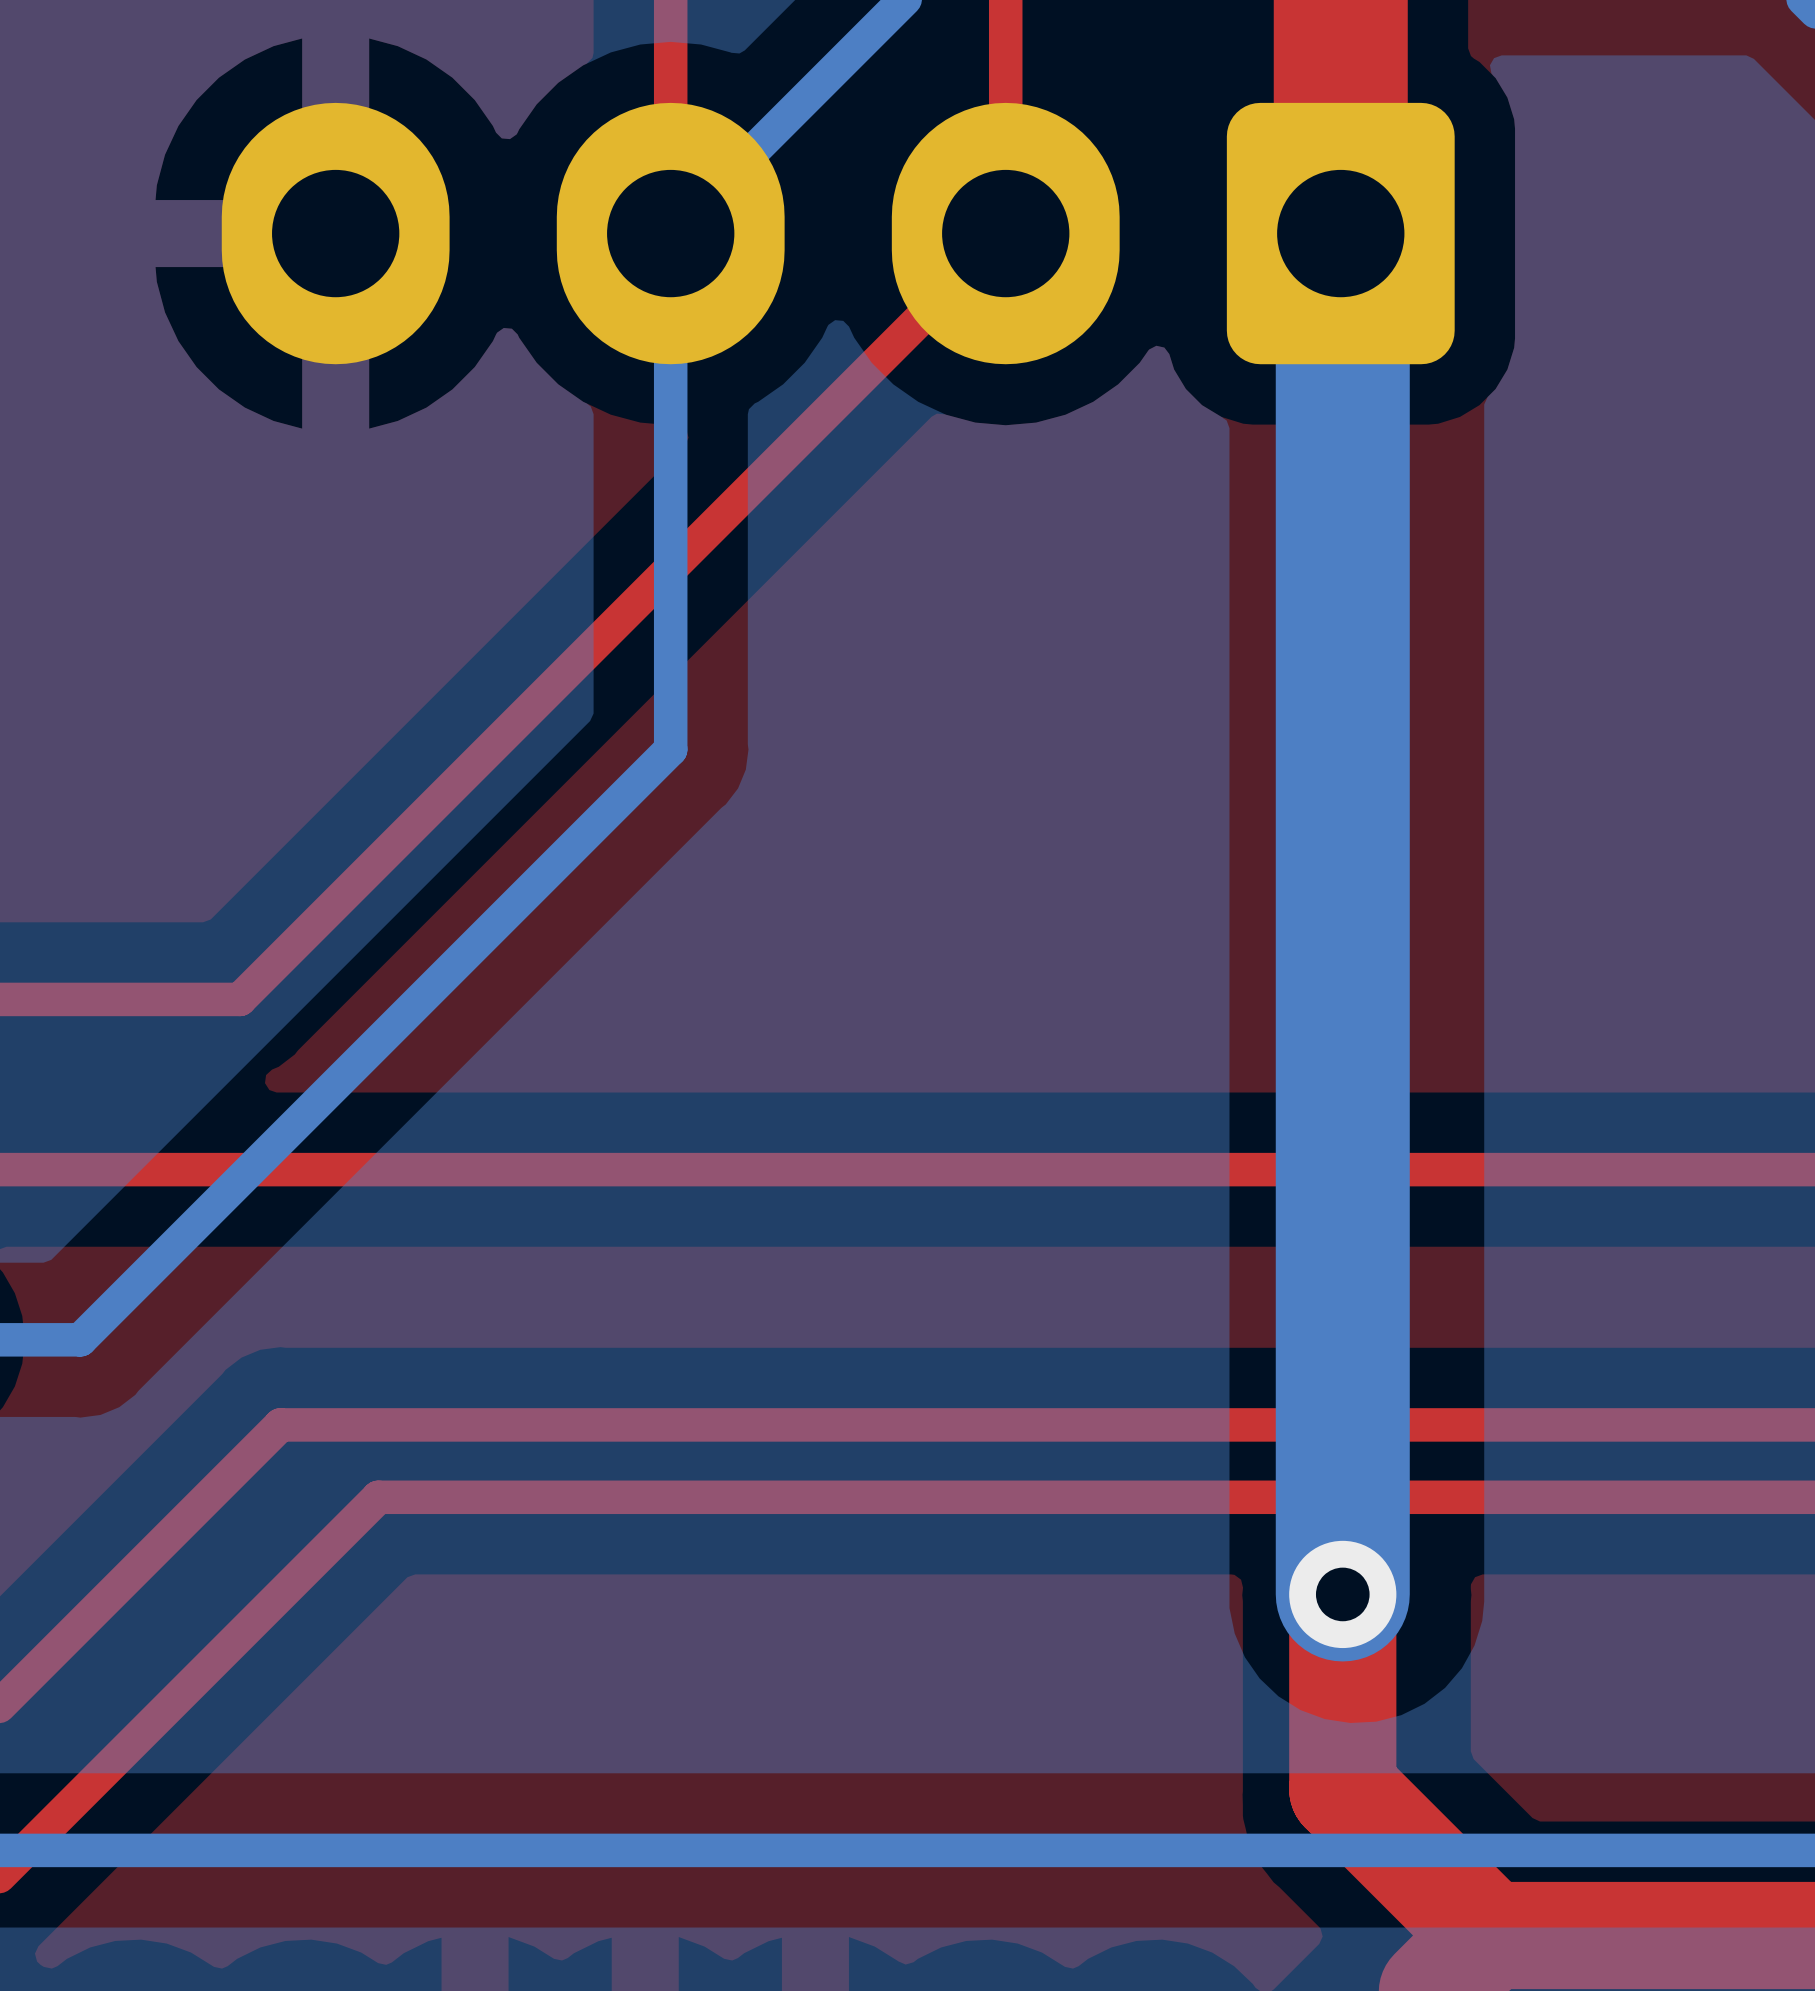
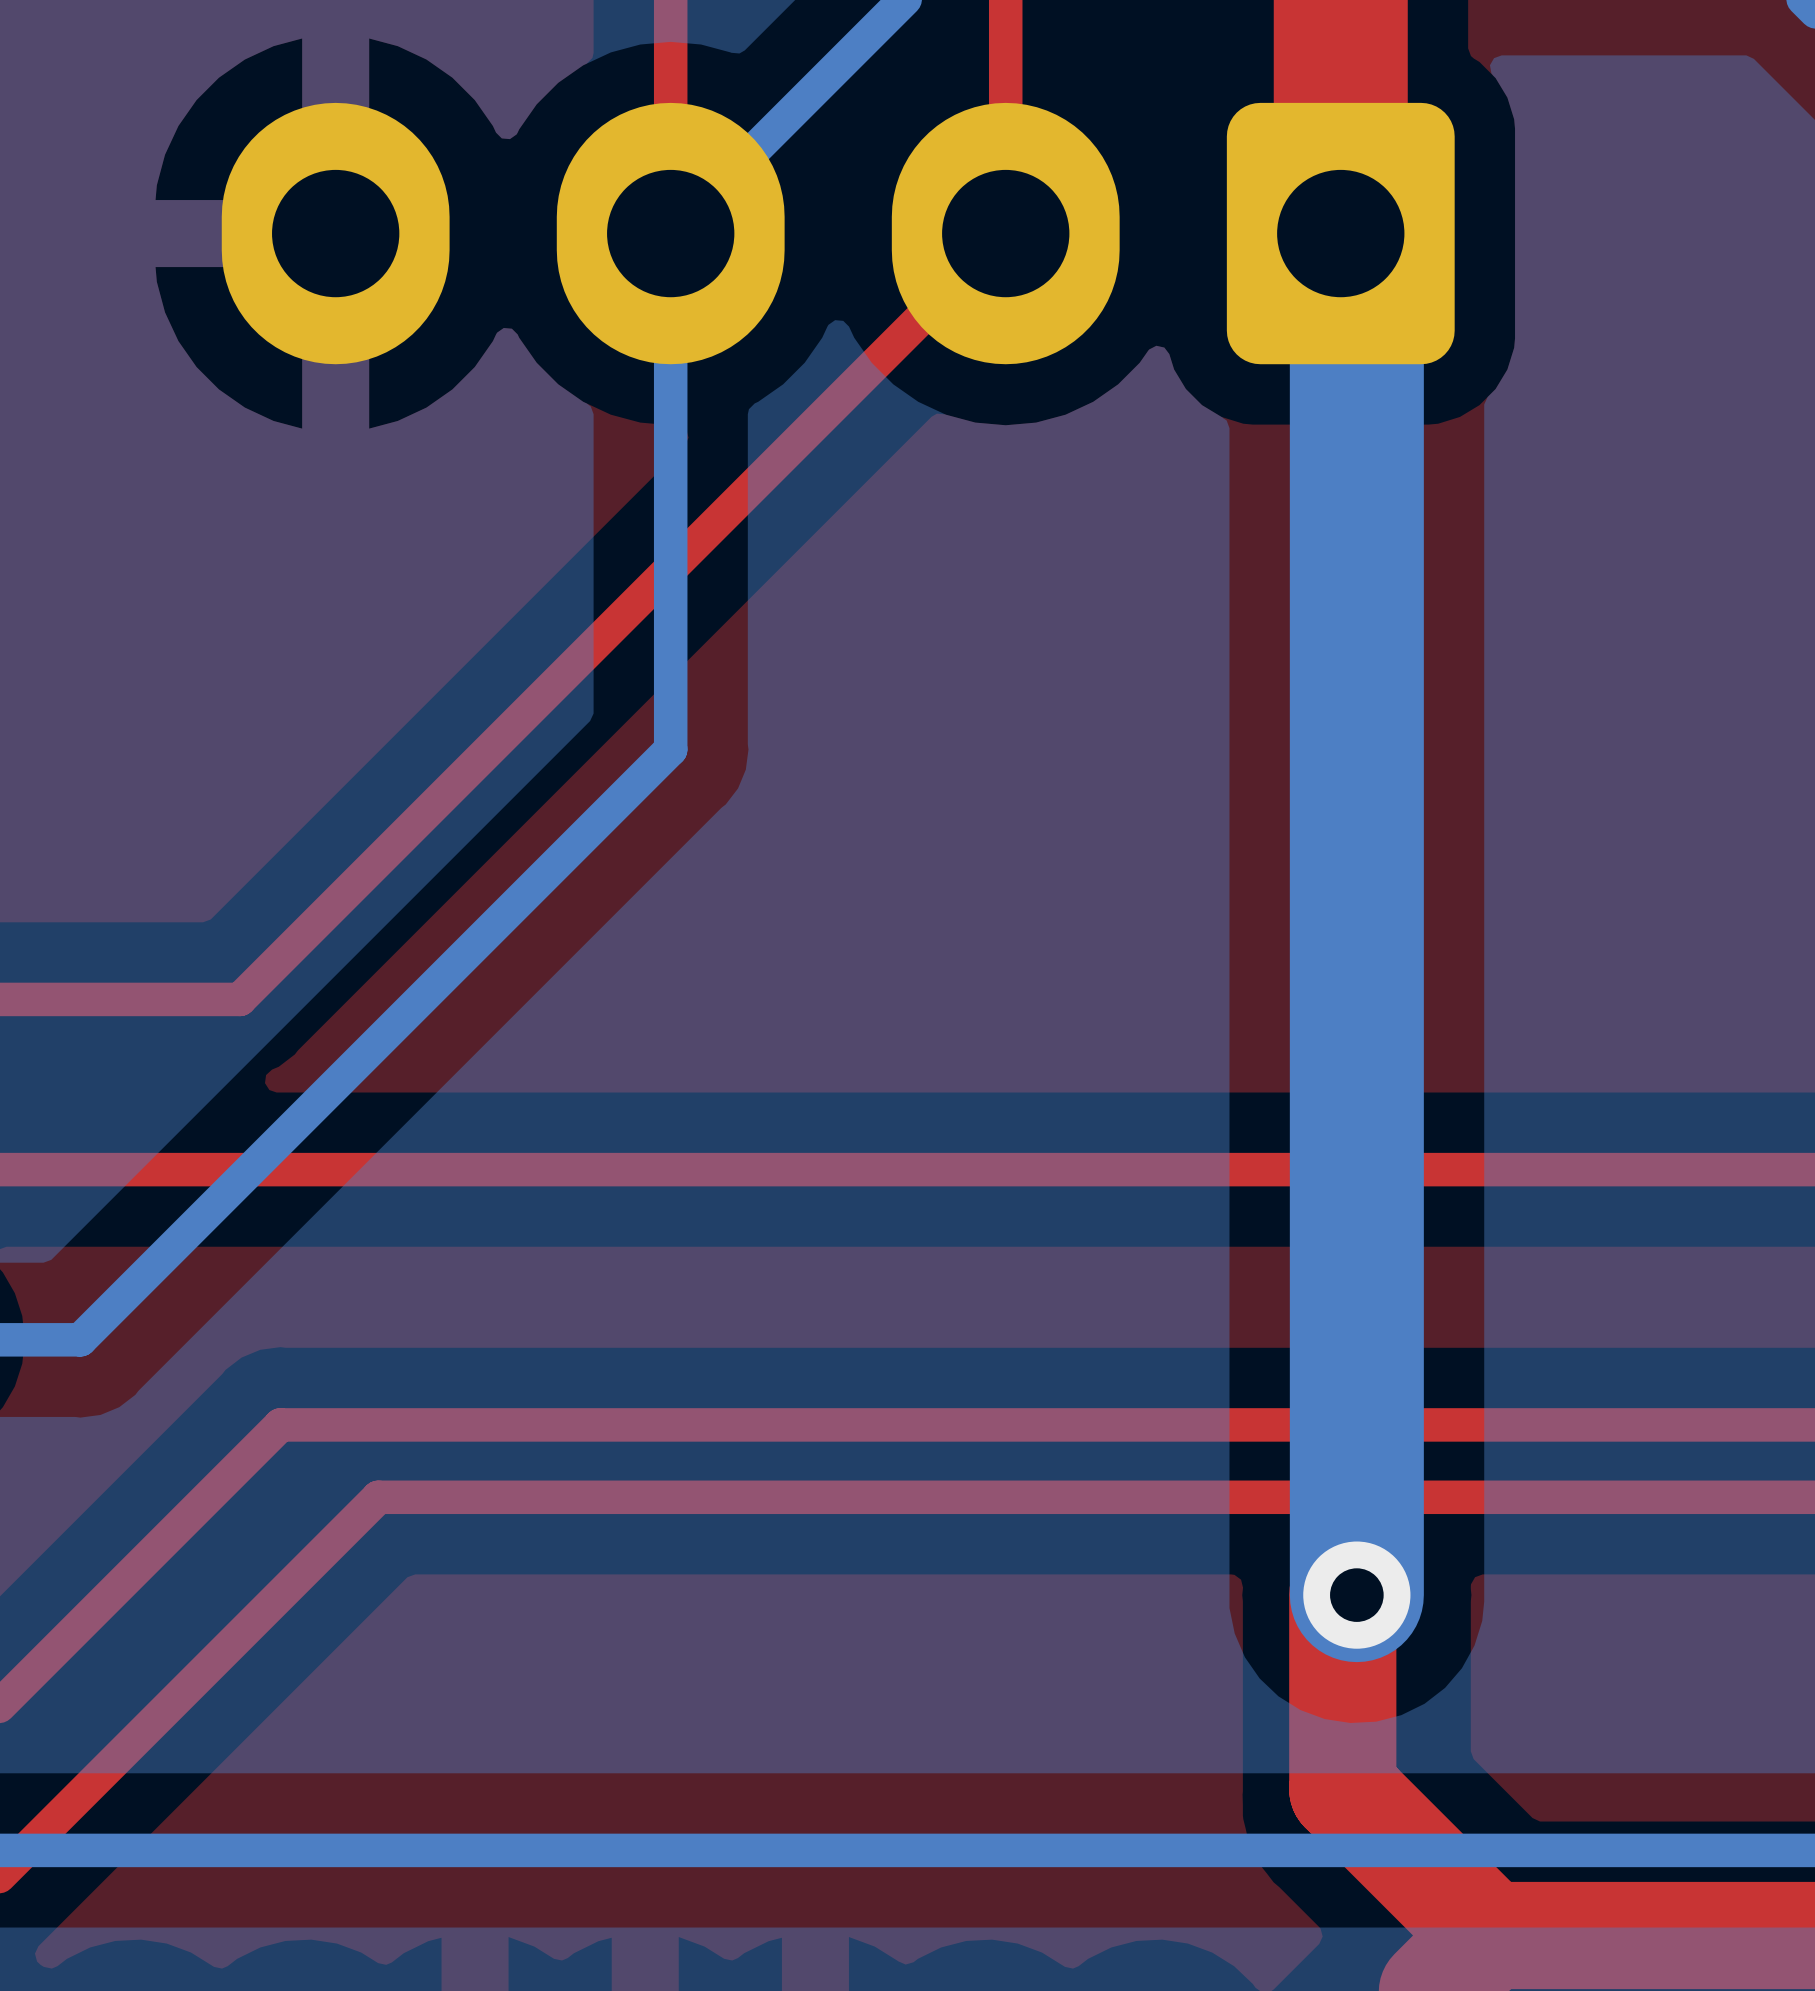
bottom track: (1342, 235) (1342, 1594) -> (1342, 235) (1356, 249) (1356, 1595)
via position: (1342, 1594) -> (1356, 1595)

